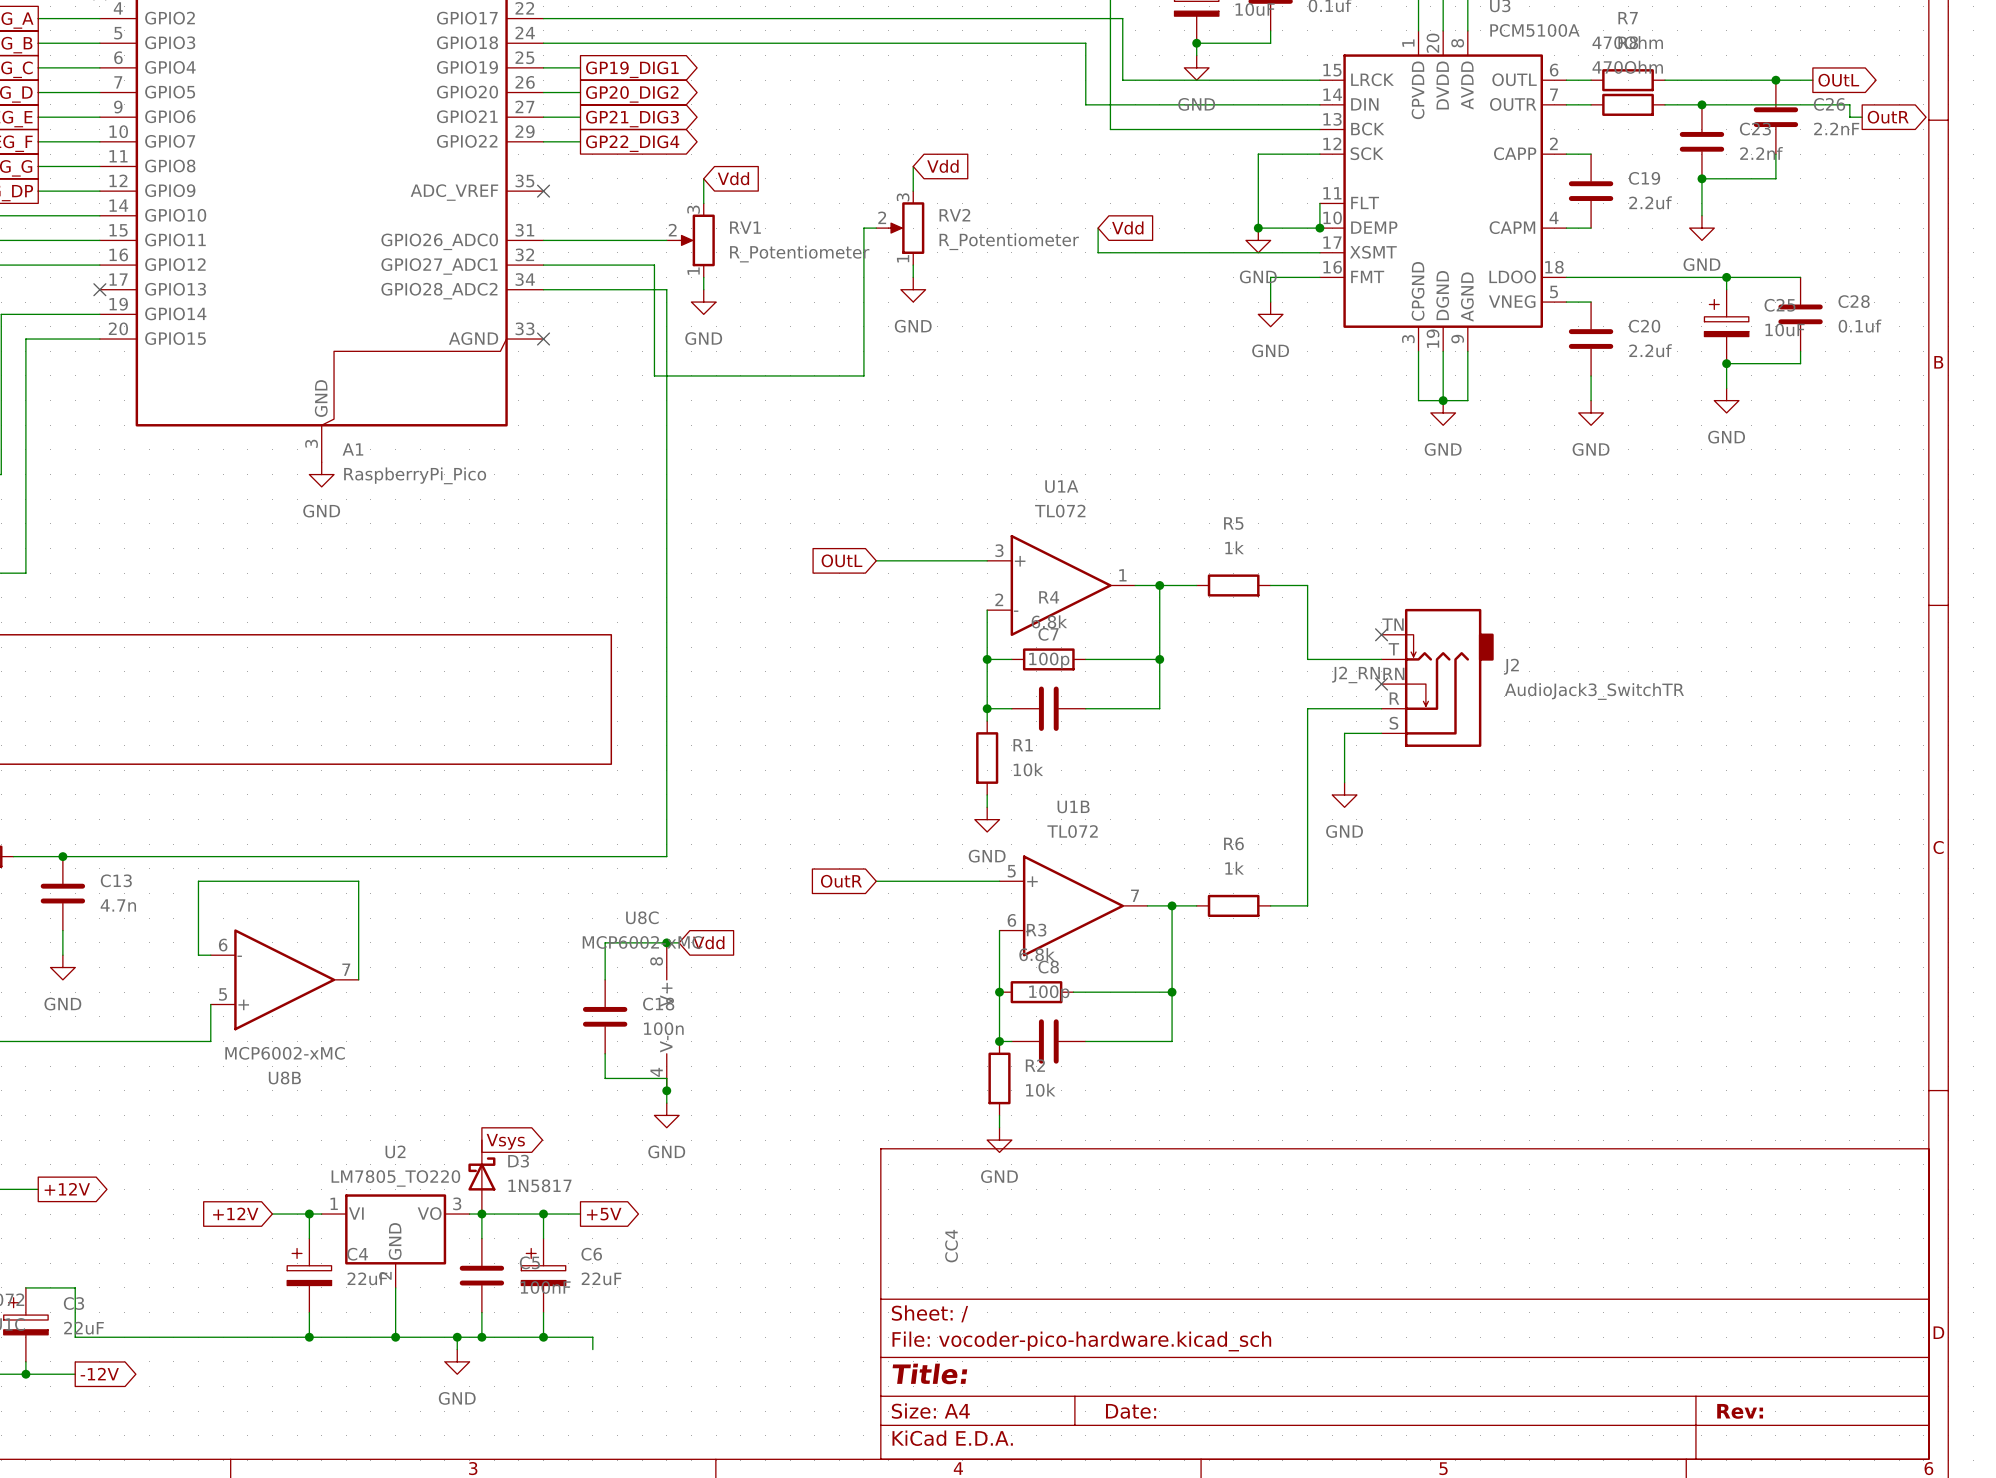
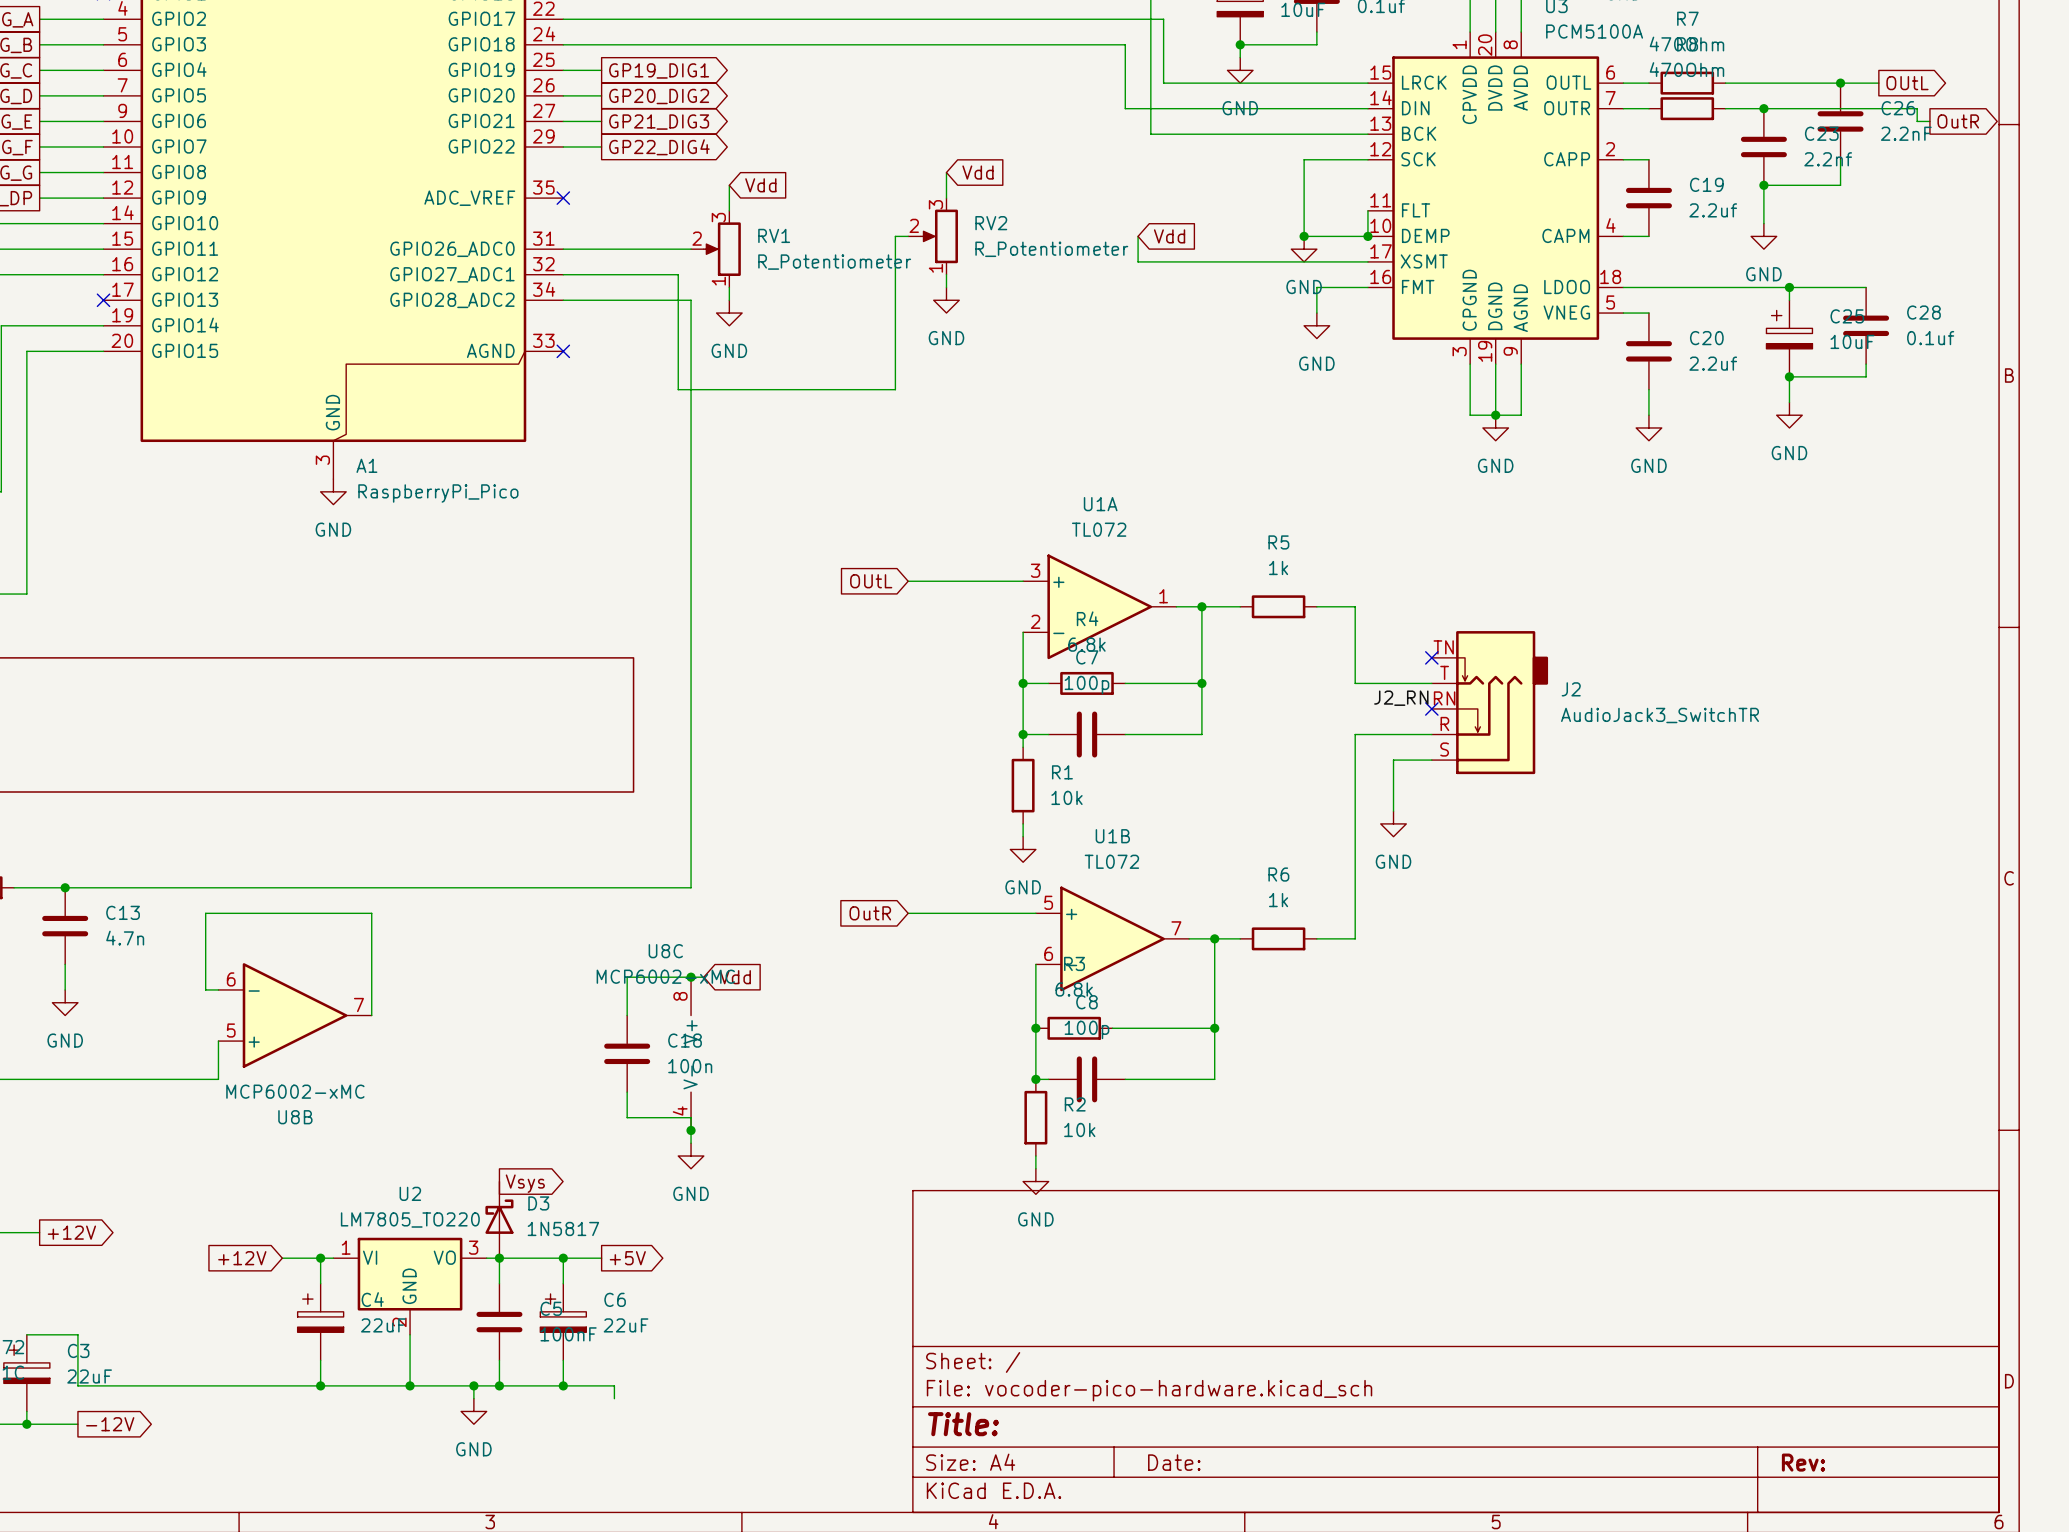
label: CC4 (951, 1246) -> none

